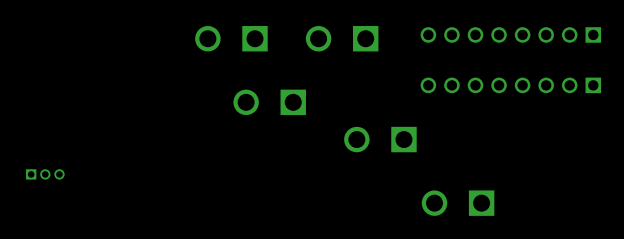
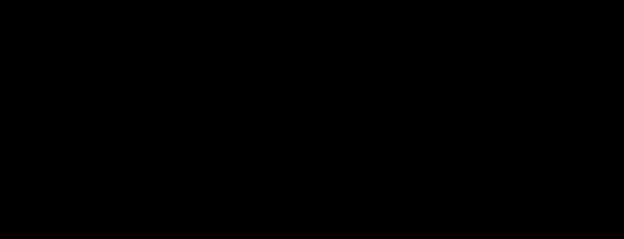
part: (510, 34) -> none
part: (231, 38) -> none
part: (342, 38) -> none
part: (510, 85) -> none
part: (269, 102) -> none
part: (380, 139) -> none
part: (45, 174) -> none
part: (458, 203) -> none

